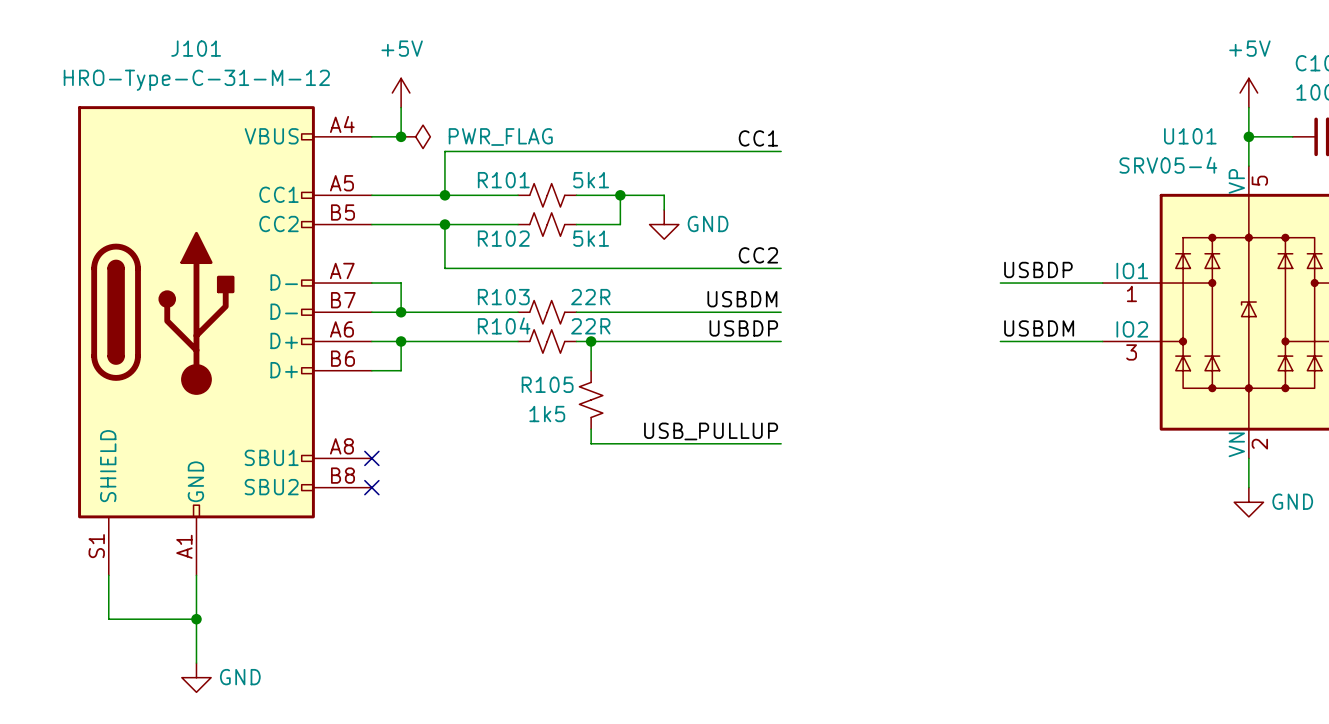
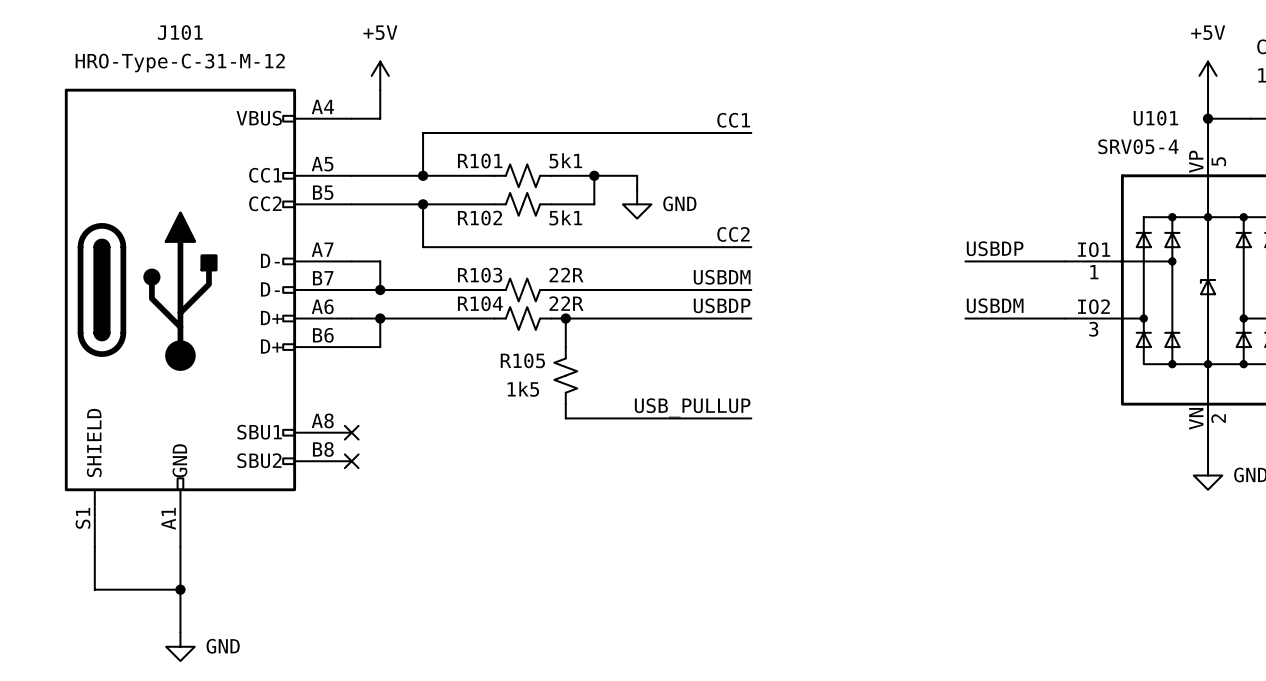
junction: (401, 136) -> none
power symbol: PWR_FLAG (415, 136) -> none

